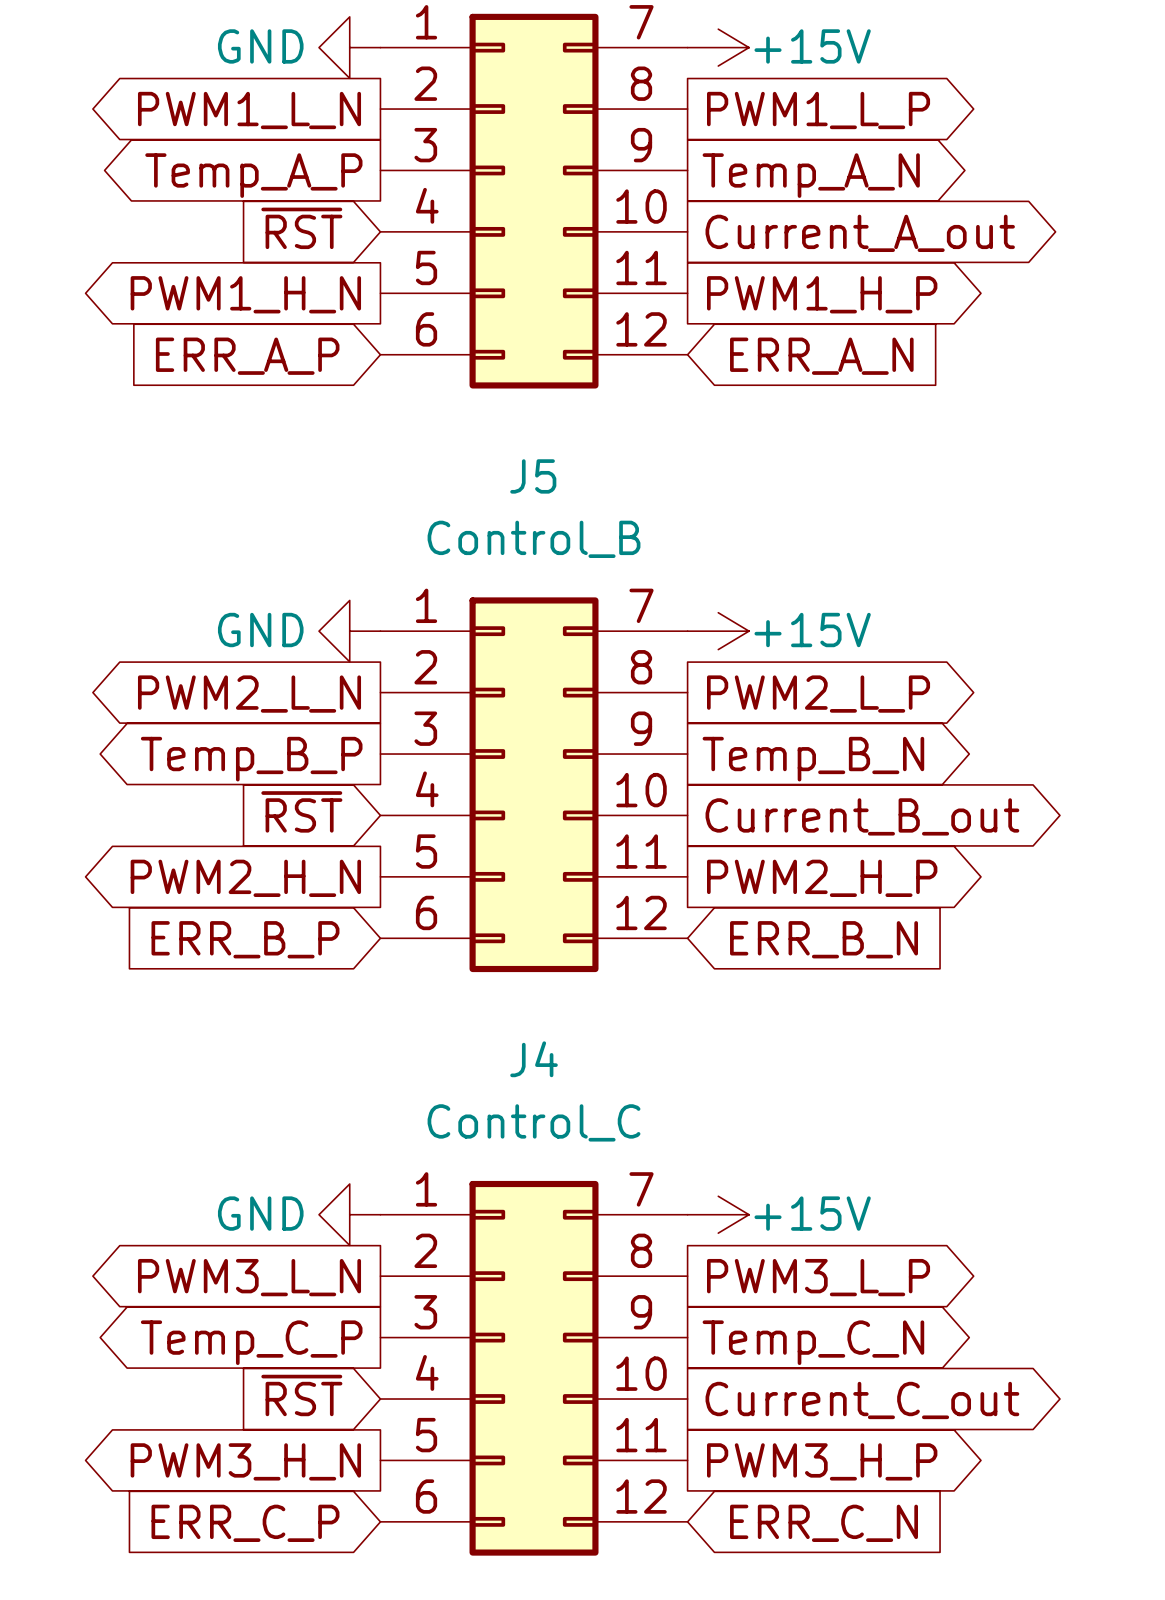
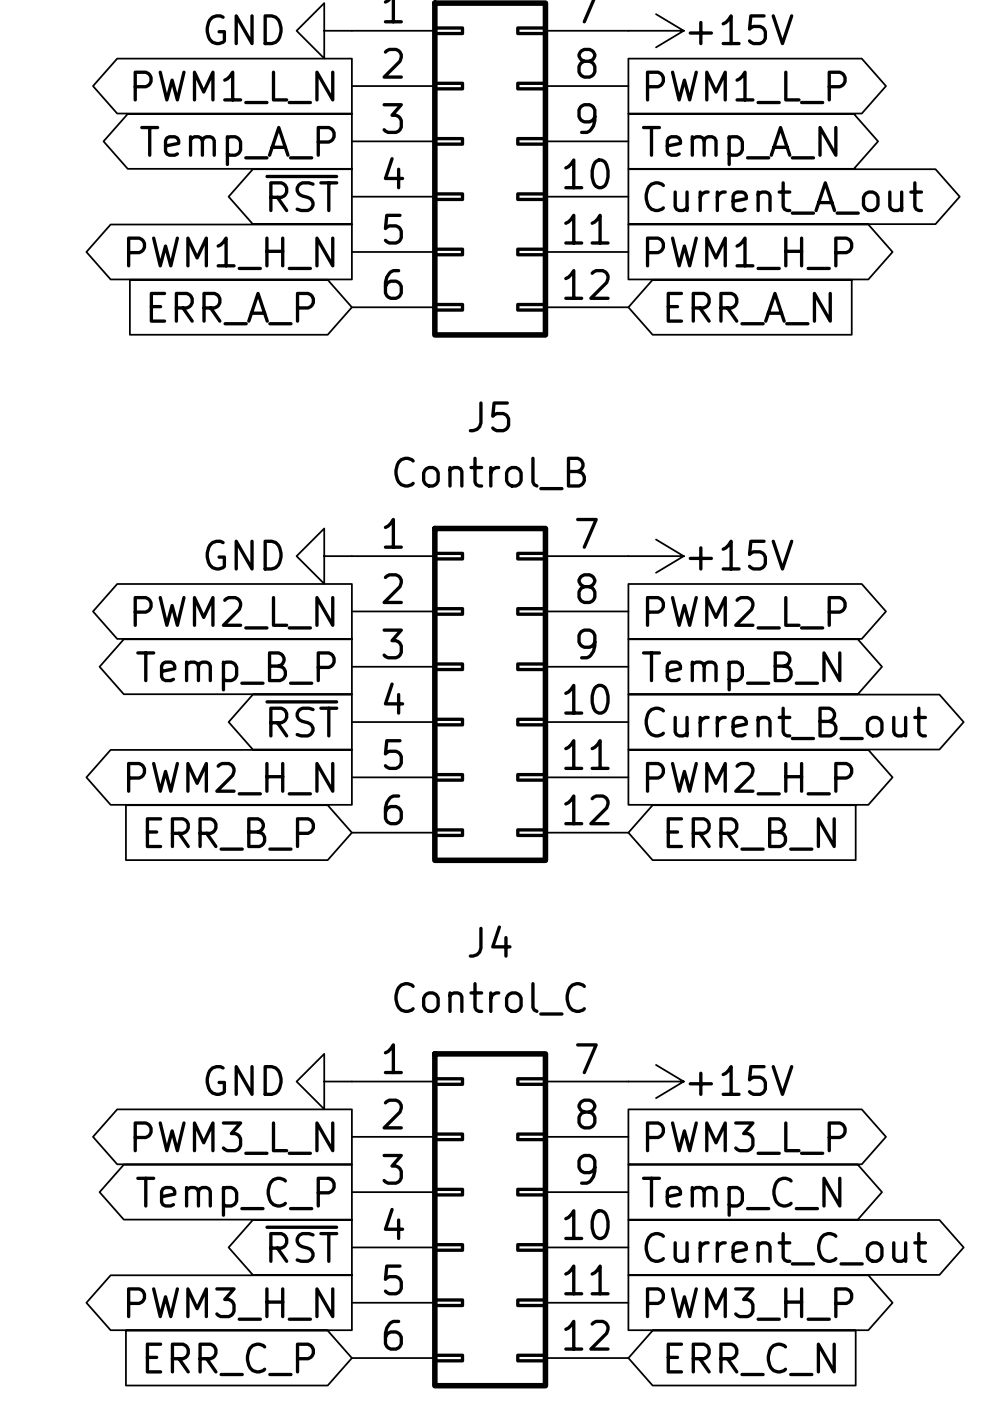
global label shape: input (301, 228) -> output (301, 193)
global label shape: input (301, 811) -> output (301, 718)
global label shape: input (301, 1395) -> output (301, 1244)

